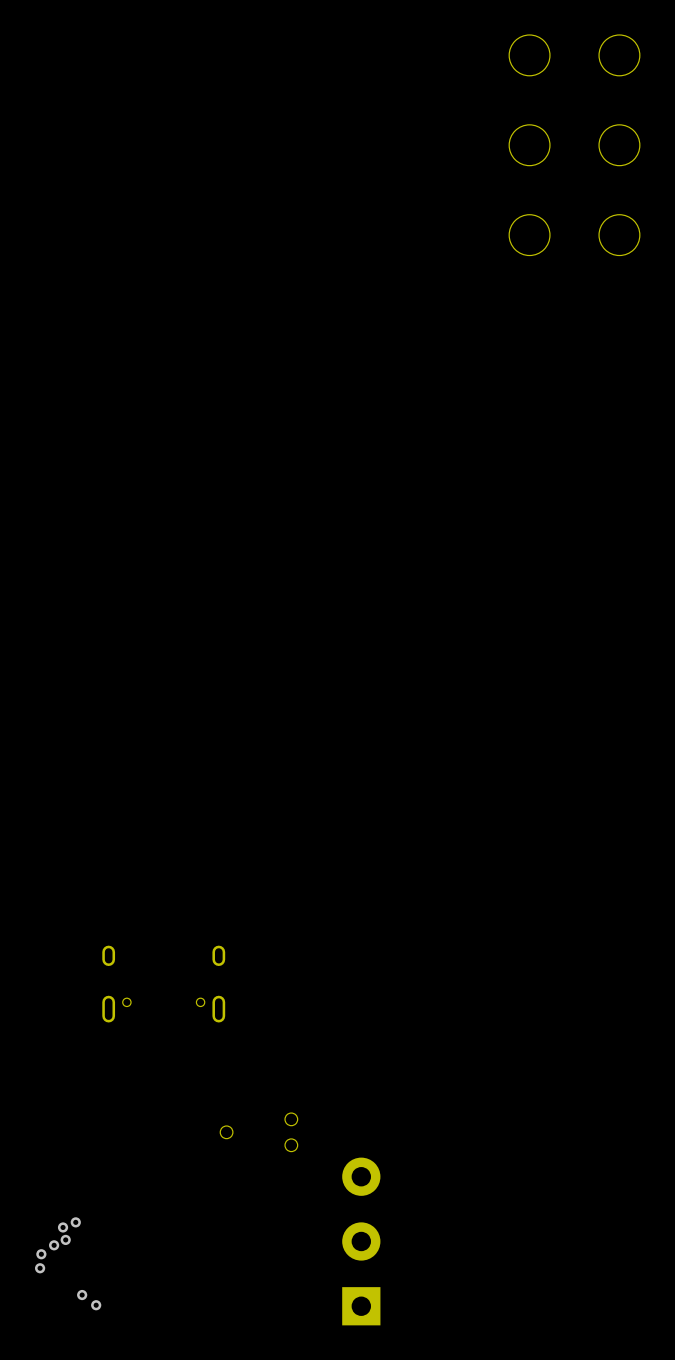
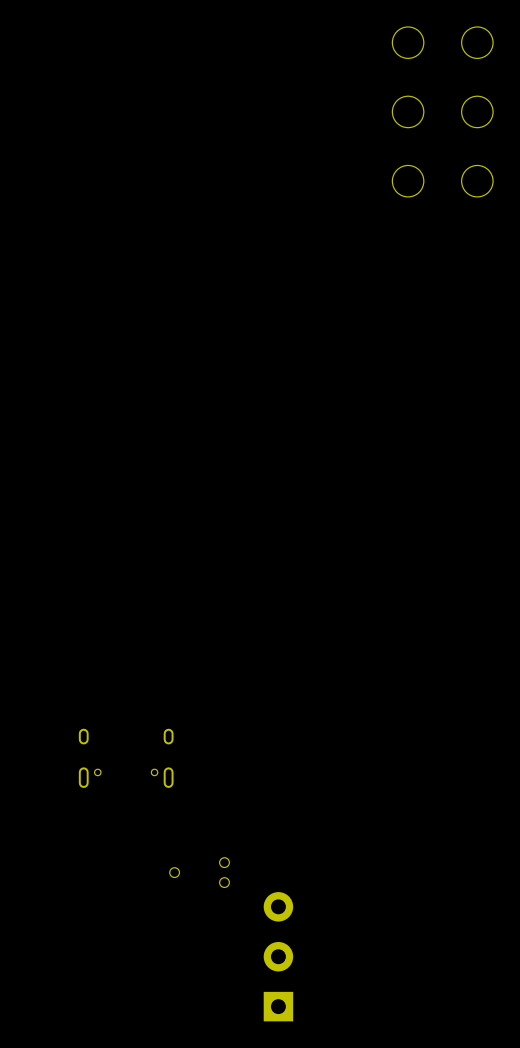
via: (75, 1222) -> none
via: (63, 1227) -> none
via: (65, 1239) -> none
via: (54, 1245) -> none
via: (41, 1254) -> none
via: (40, 1268) -> none
via: (82, 1295) -> none
via: (96, 1305) -> none

